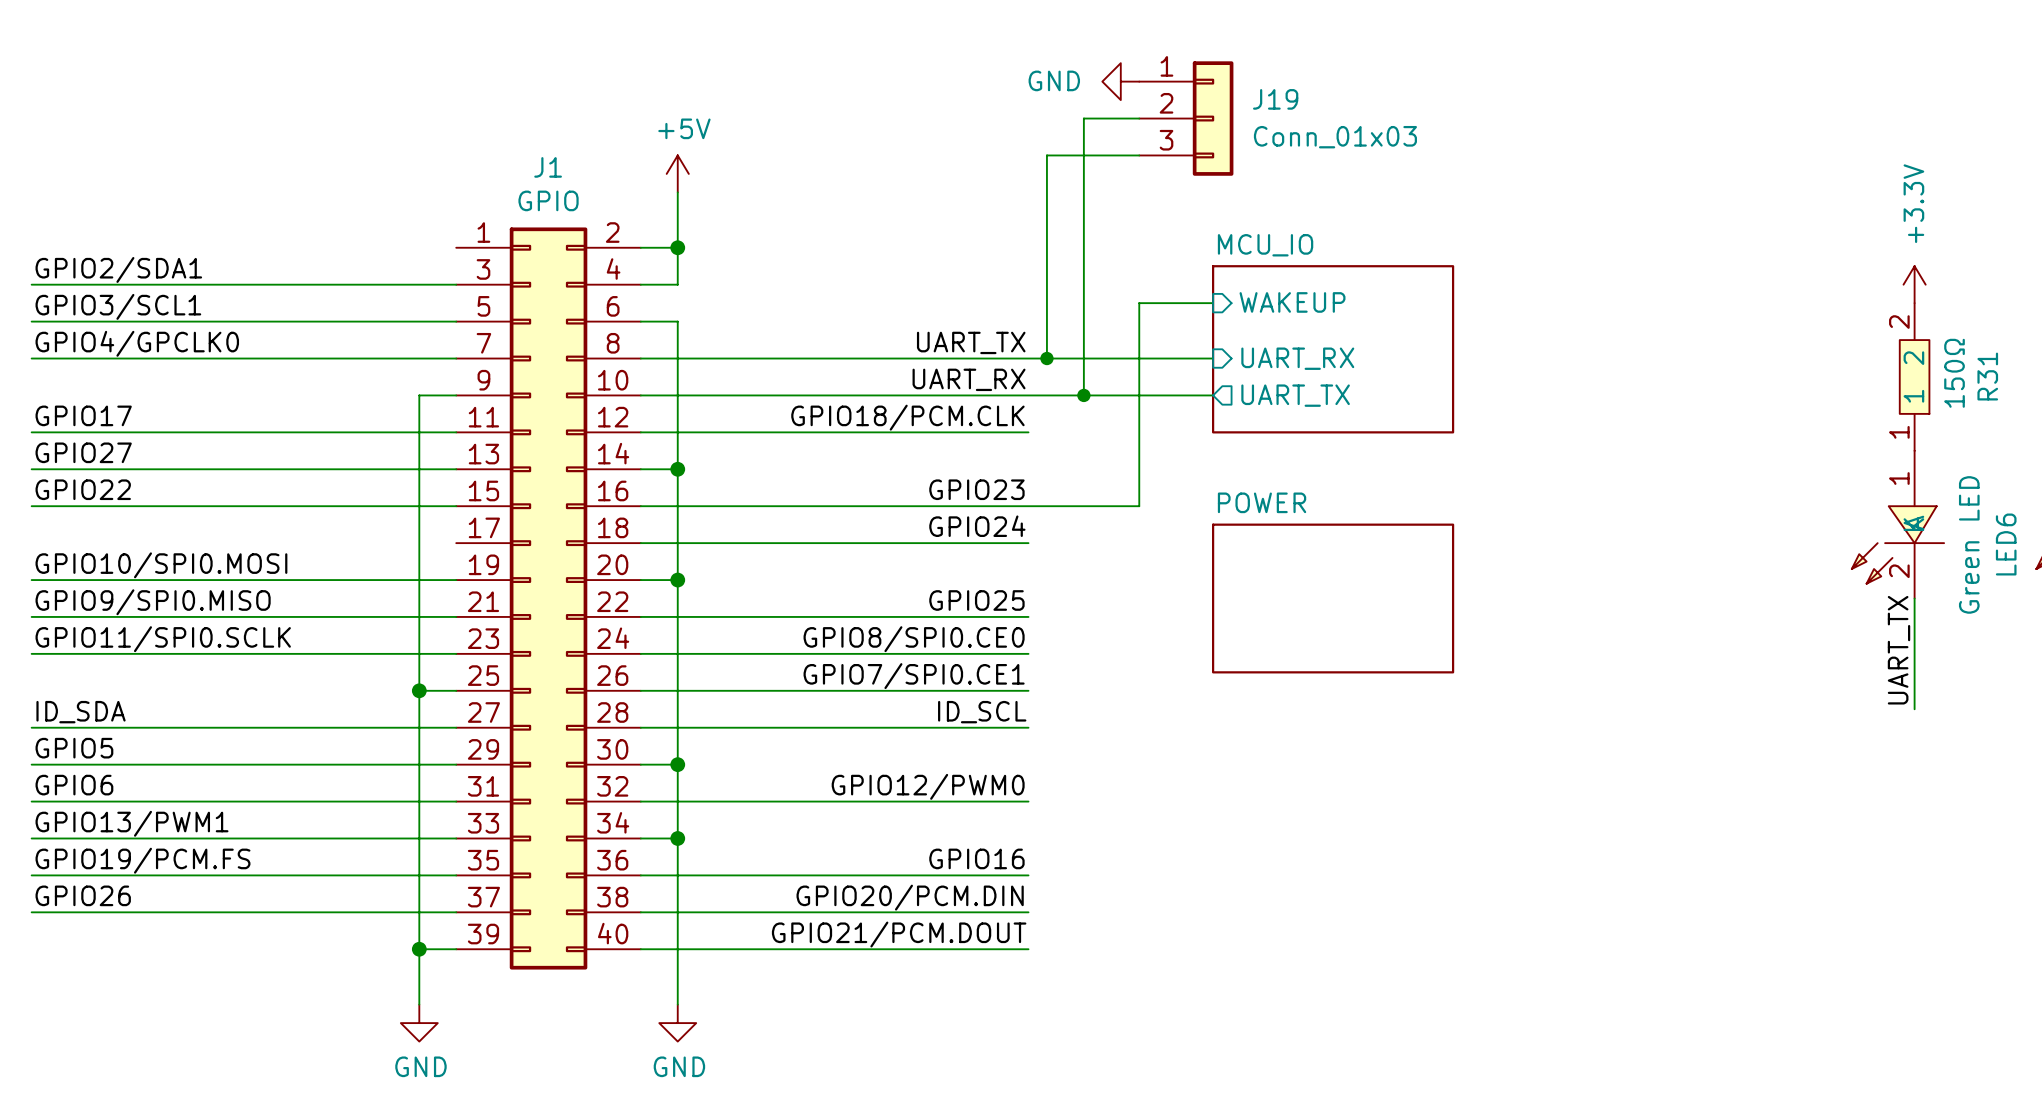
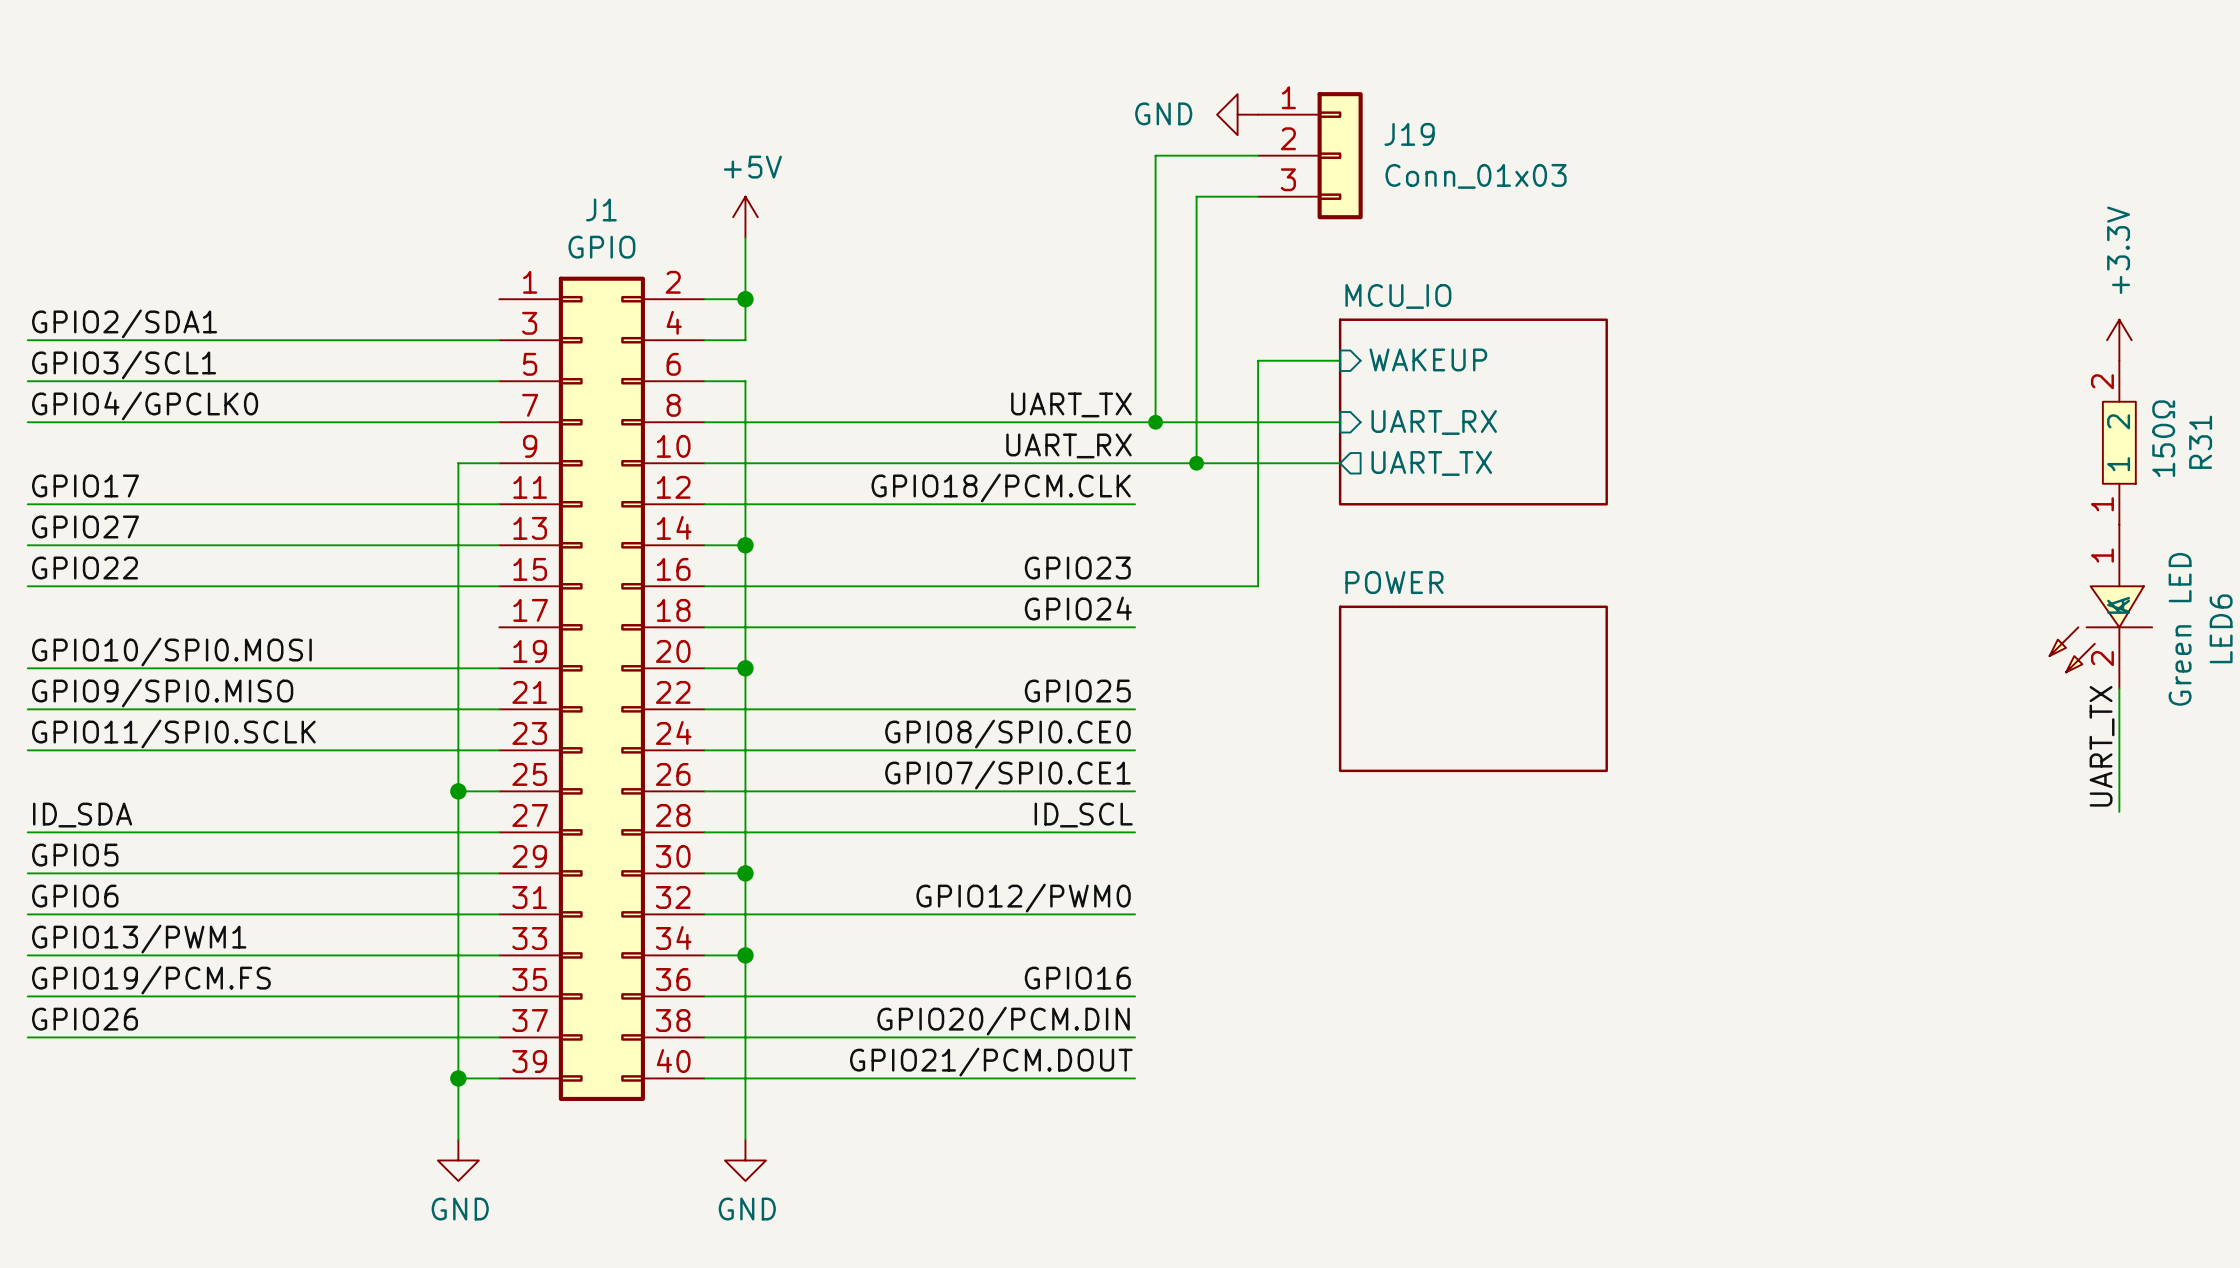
wire: (1083, 118) (1083, 155) (1046, 155) -> (1196, 155) (1155, 155) (1155, 196)

